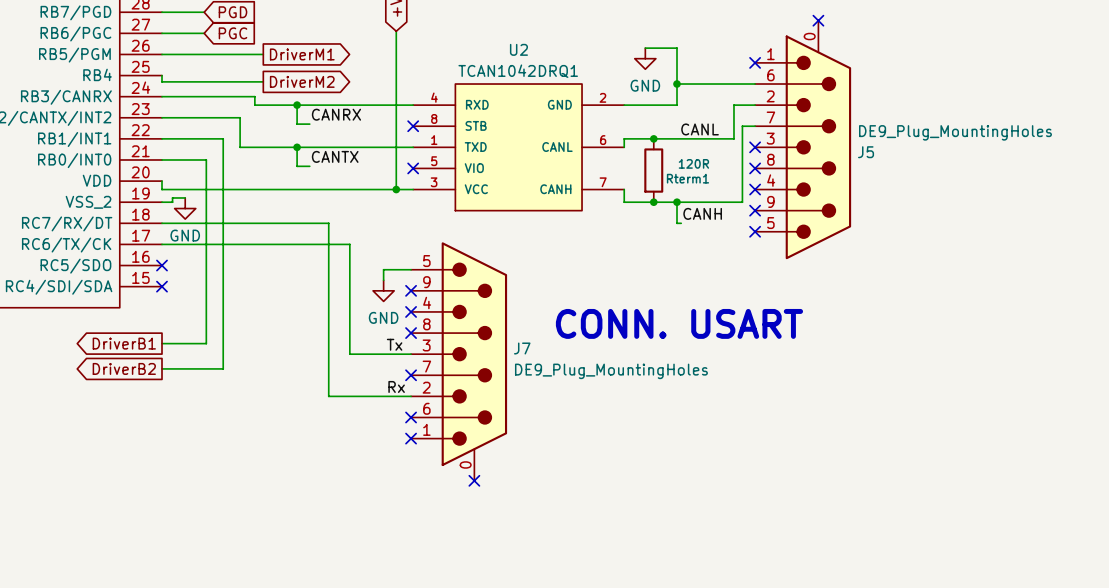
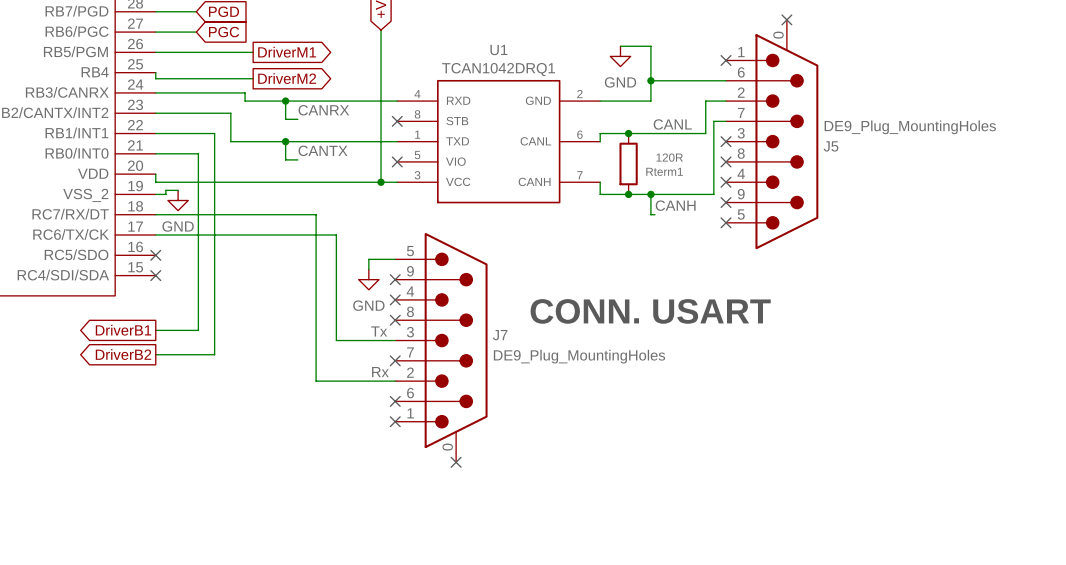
U2 name: U2 (518, 49) -> U1 (498, 50)

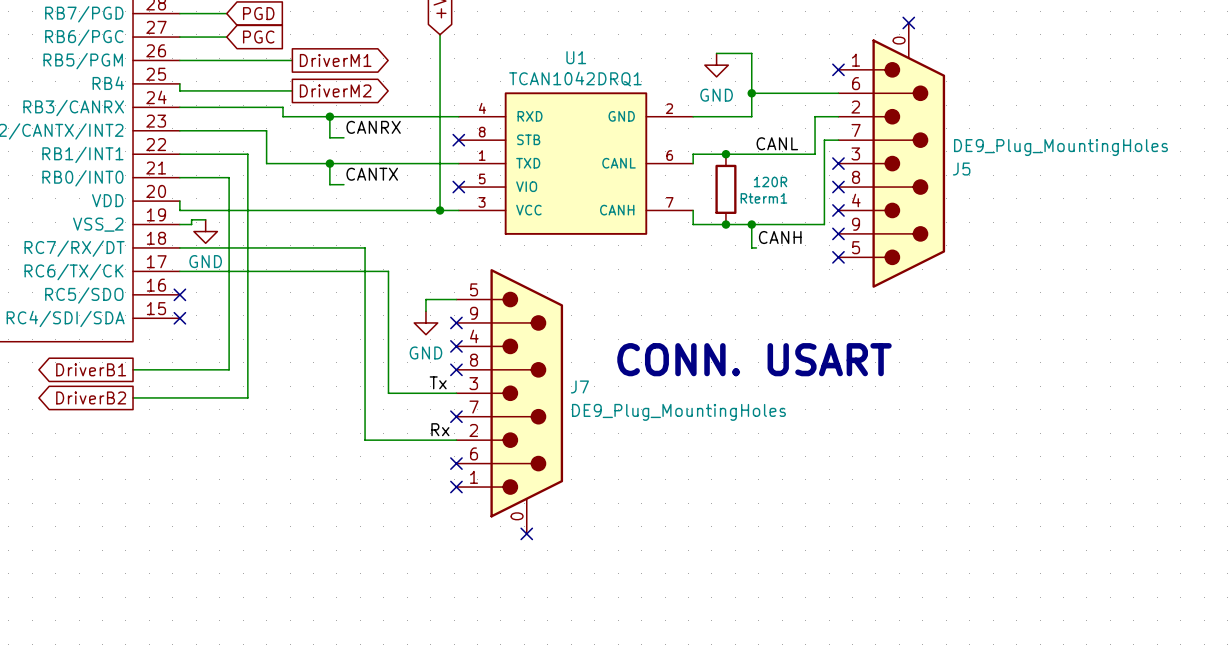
wire: (198, 320) (198, 330) (155, 330) -> (229, 369) (133, 369)
global label position: DriverB1 (123, 330) -> DriverB1 (91, 369)
wire: (214, 344) (214, 354) (155, 354) -> (247, 397) (133, 397)
global label position: DriverB2 (123, 354) -> DriverB2 (91, 397)

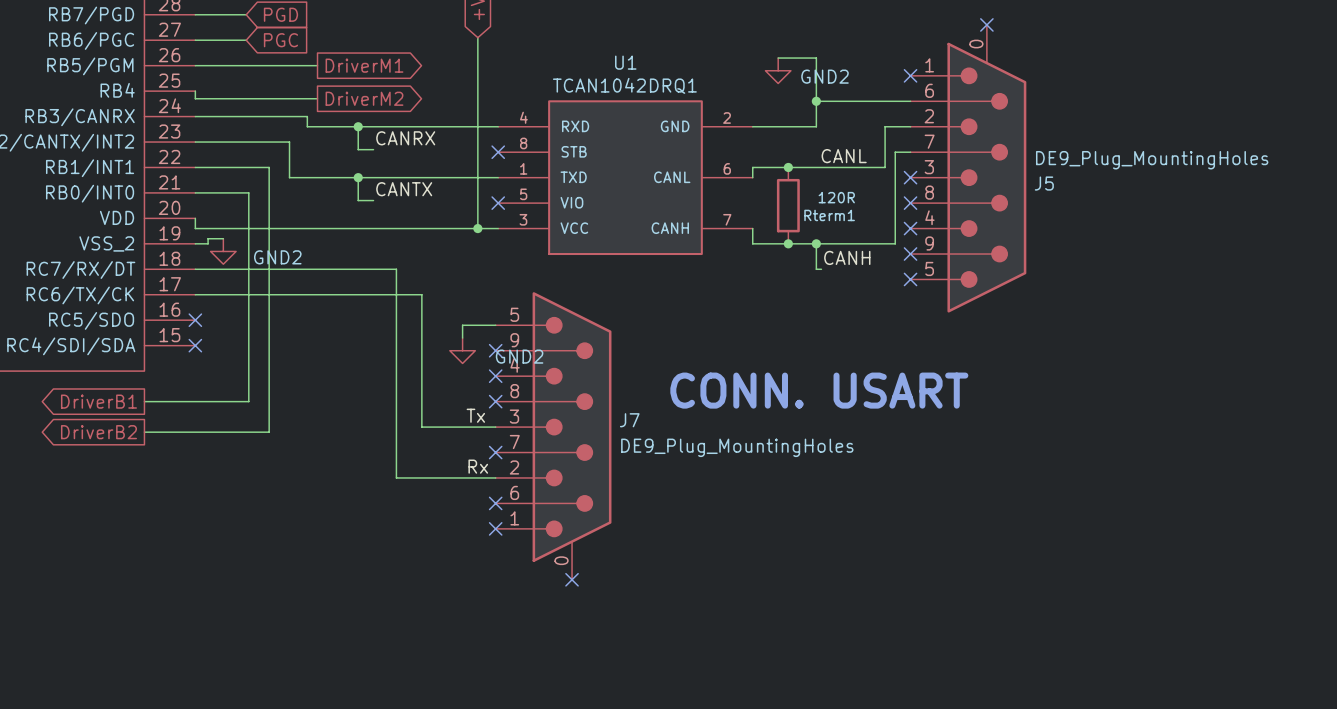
power symbol: GND (716, 65) -> GND2 (778, 70)
power symbol: GND (205, 231) -> GND2 (223, 251)
power symbol: GND (425, 322) -> GND2 (462, 350)

